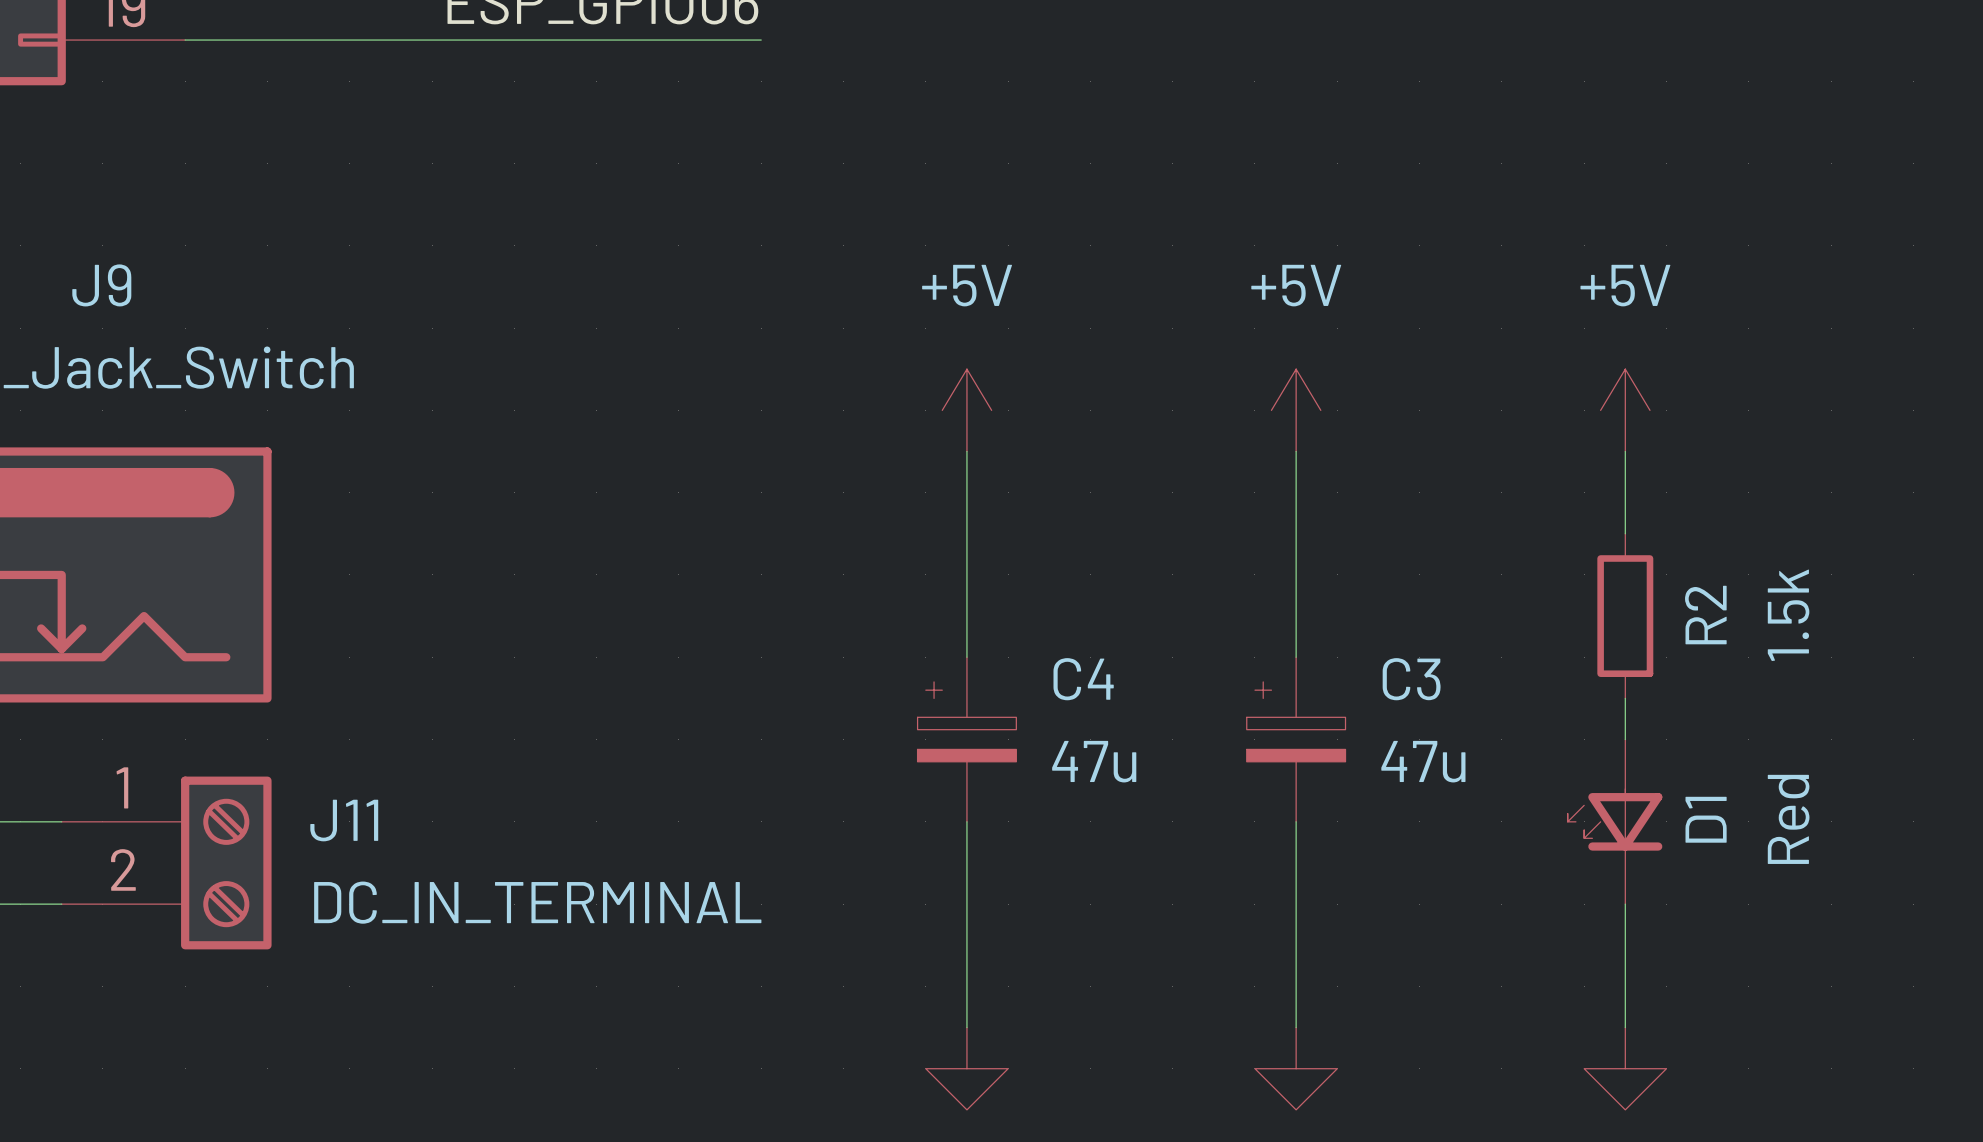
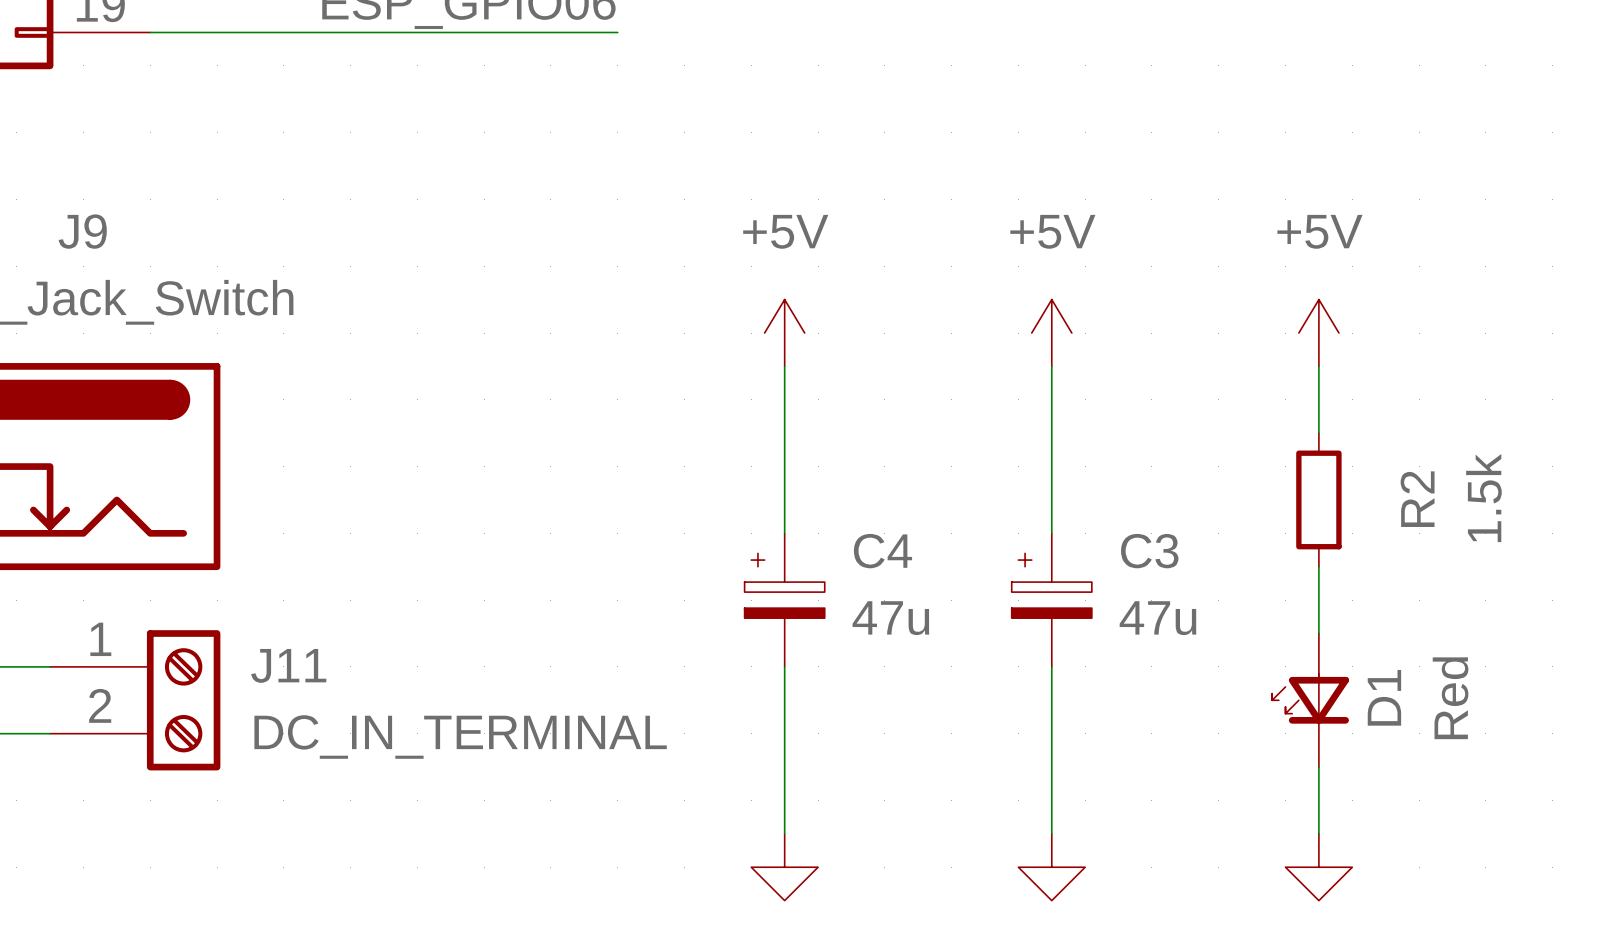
R2 name position: R2 (1705, 615) -> R2 (1417, 499)
R2 value position: 1.5k (1788, 615) -> 1.5k (1483, 498)
D1 position: (1615, 821) -> (1310, 700)

